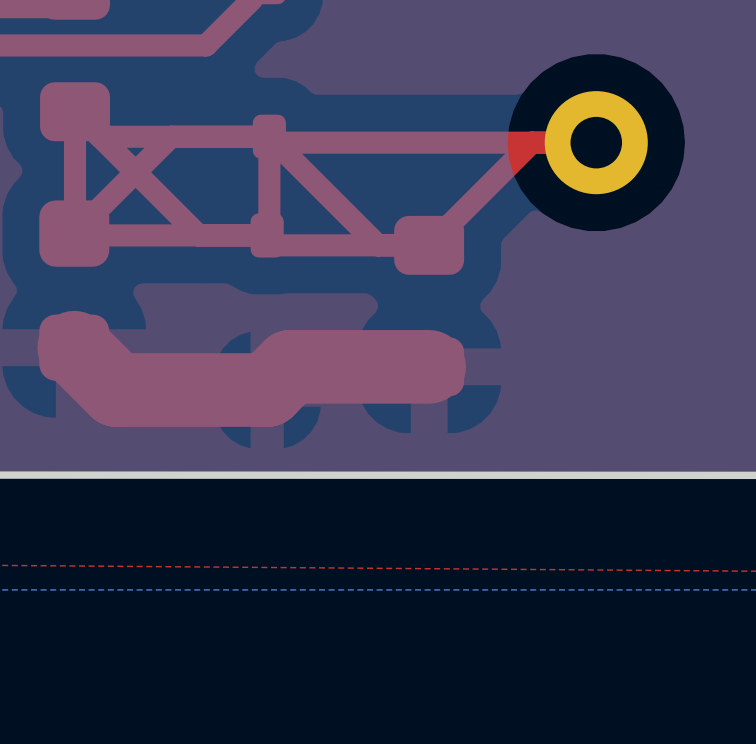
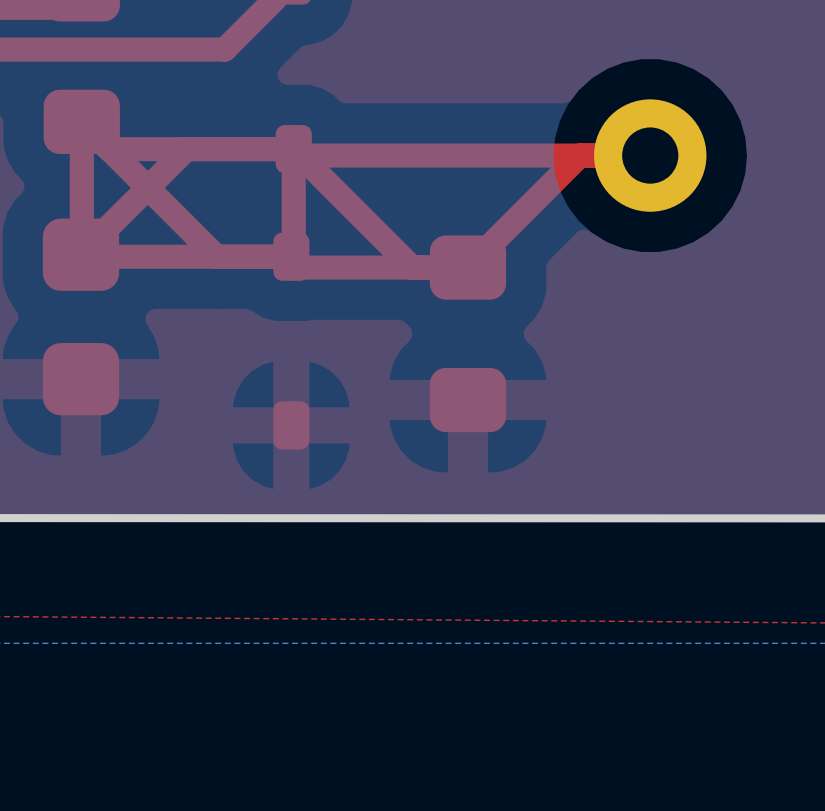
top track: (74, 347) (116, 390) (267, 390) (290, 366) (429, 366) -> none

